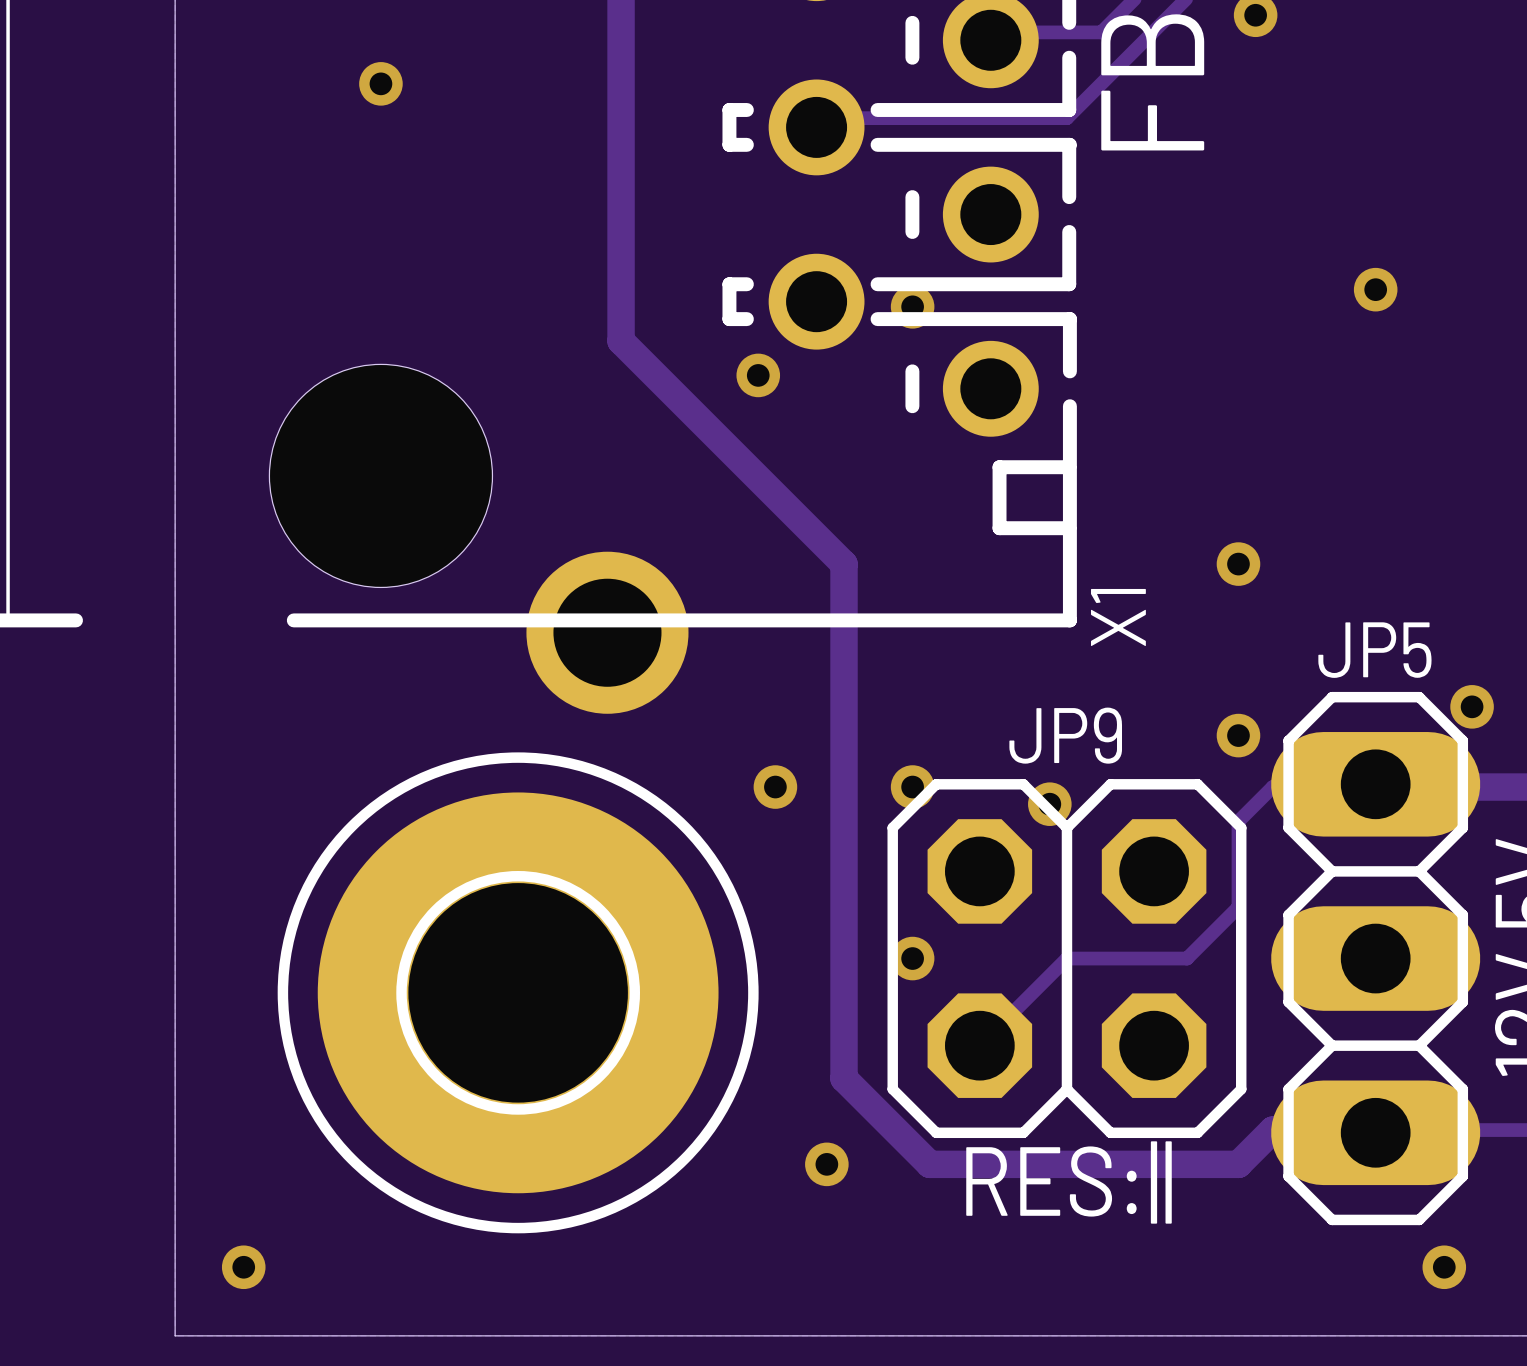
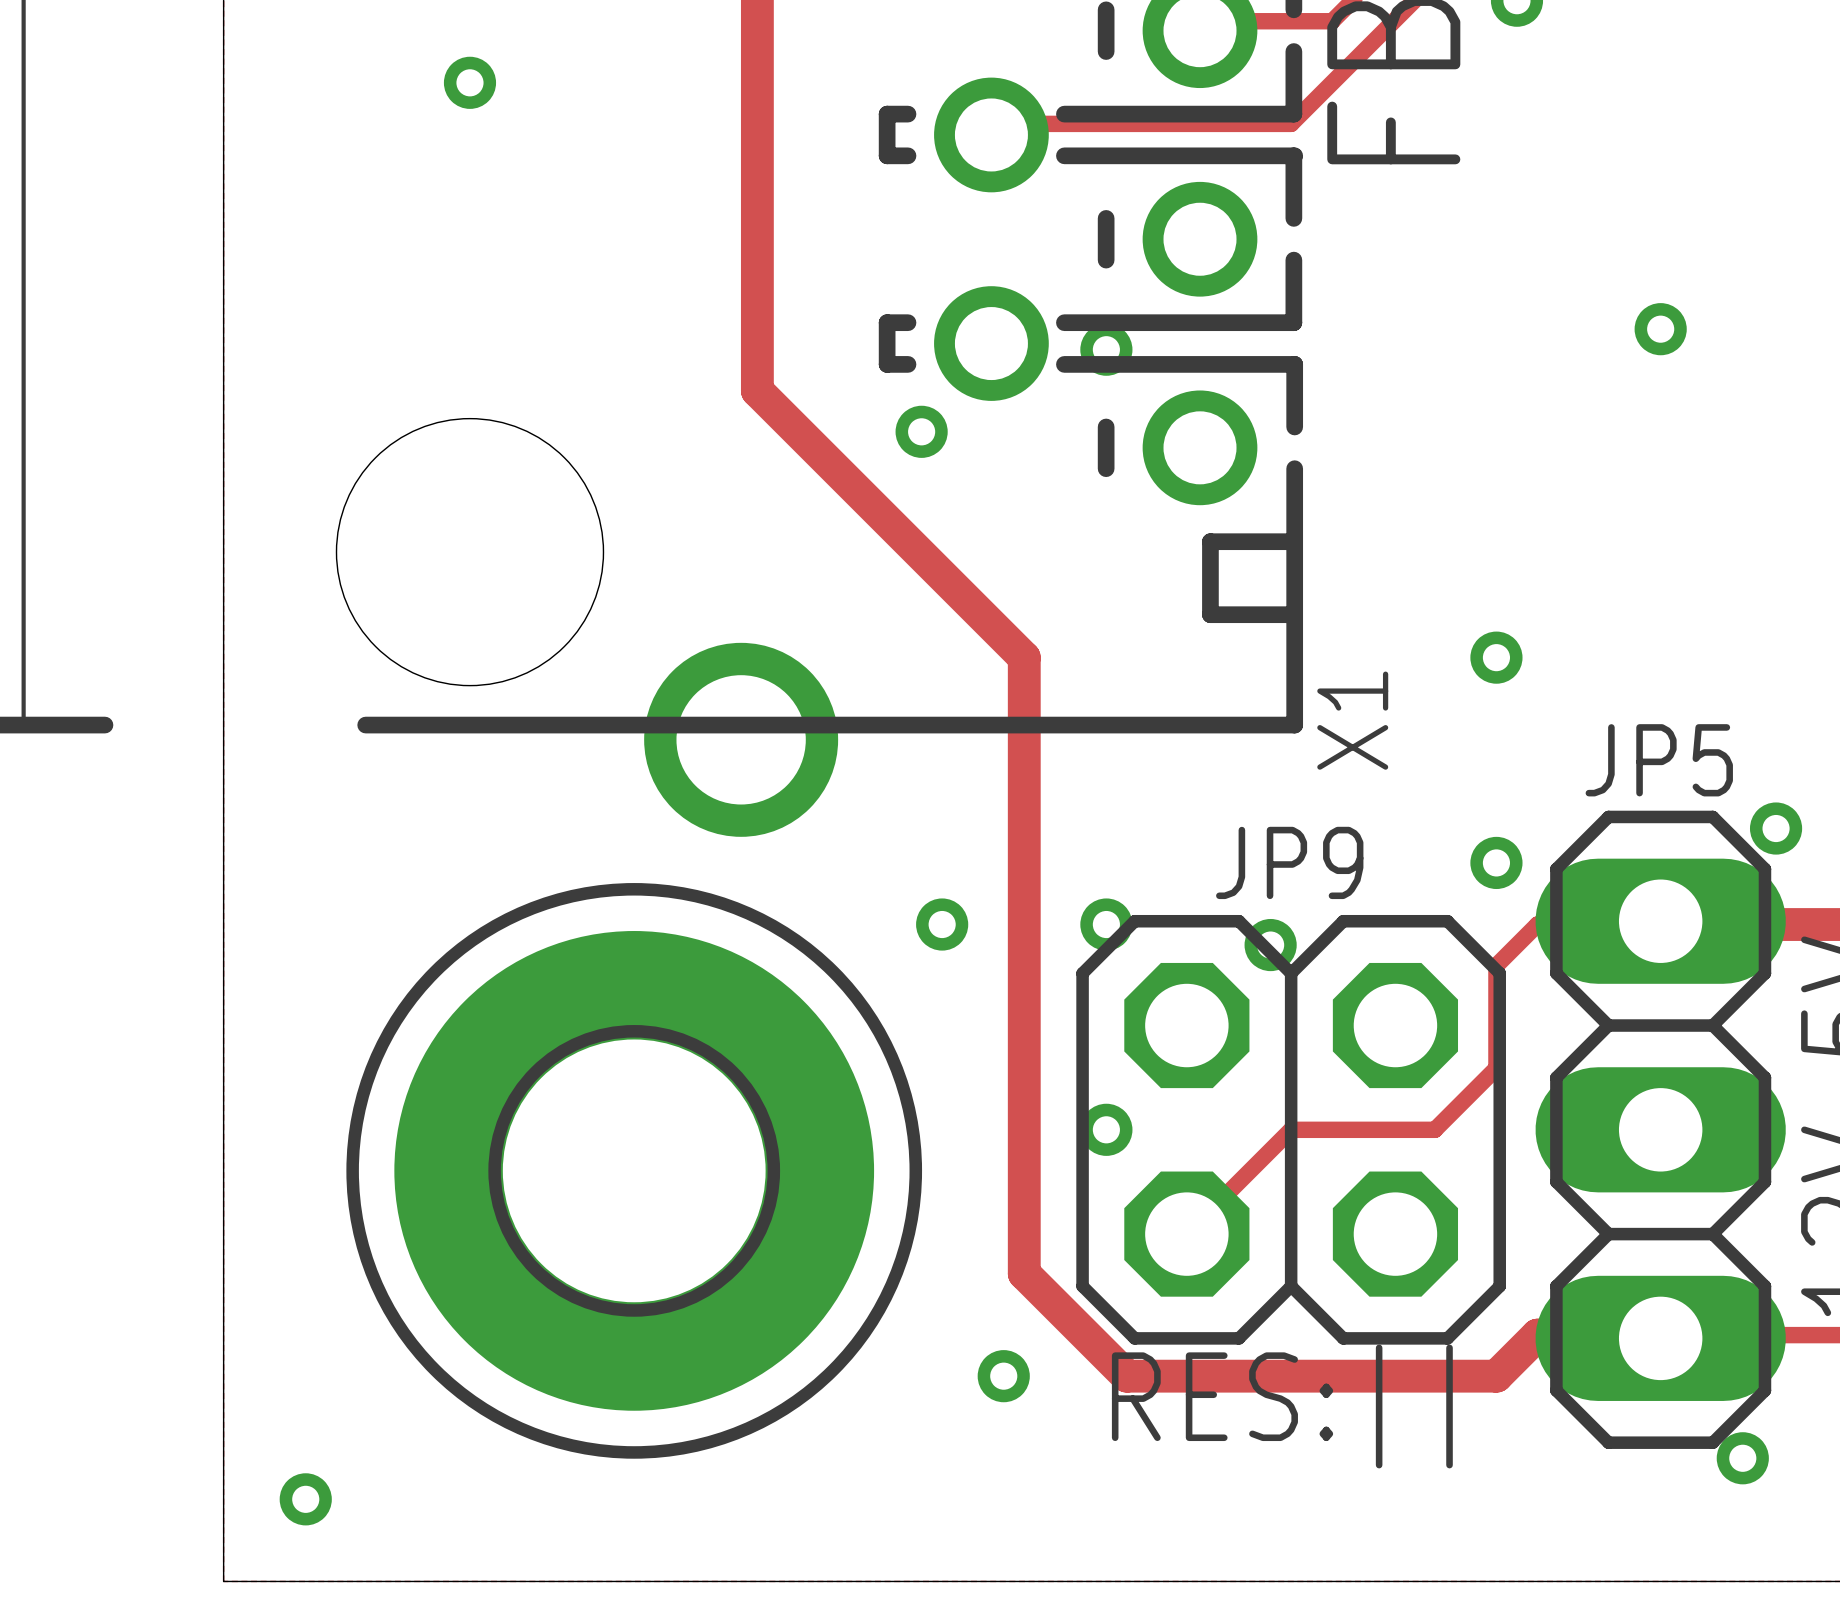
via position: (1444, 1267) -> (1742, 1458)

